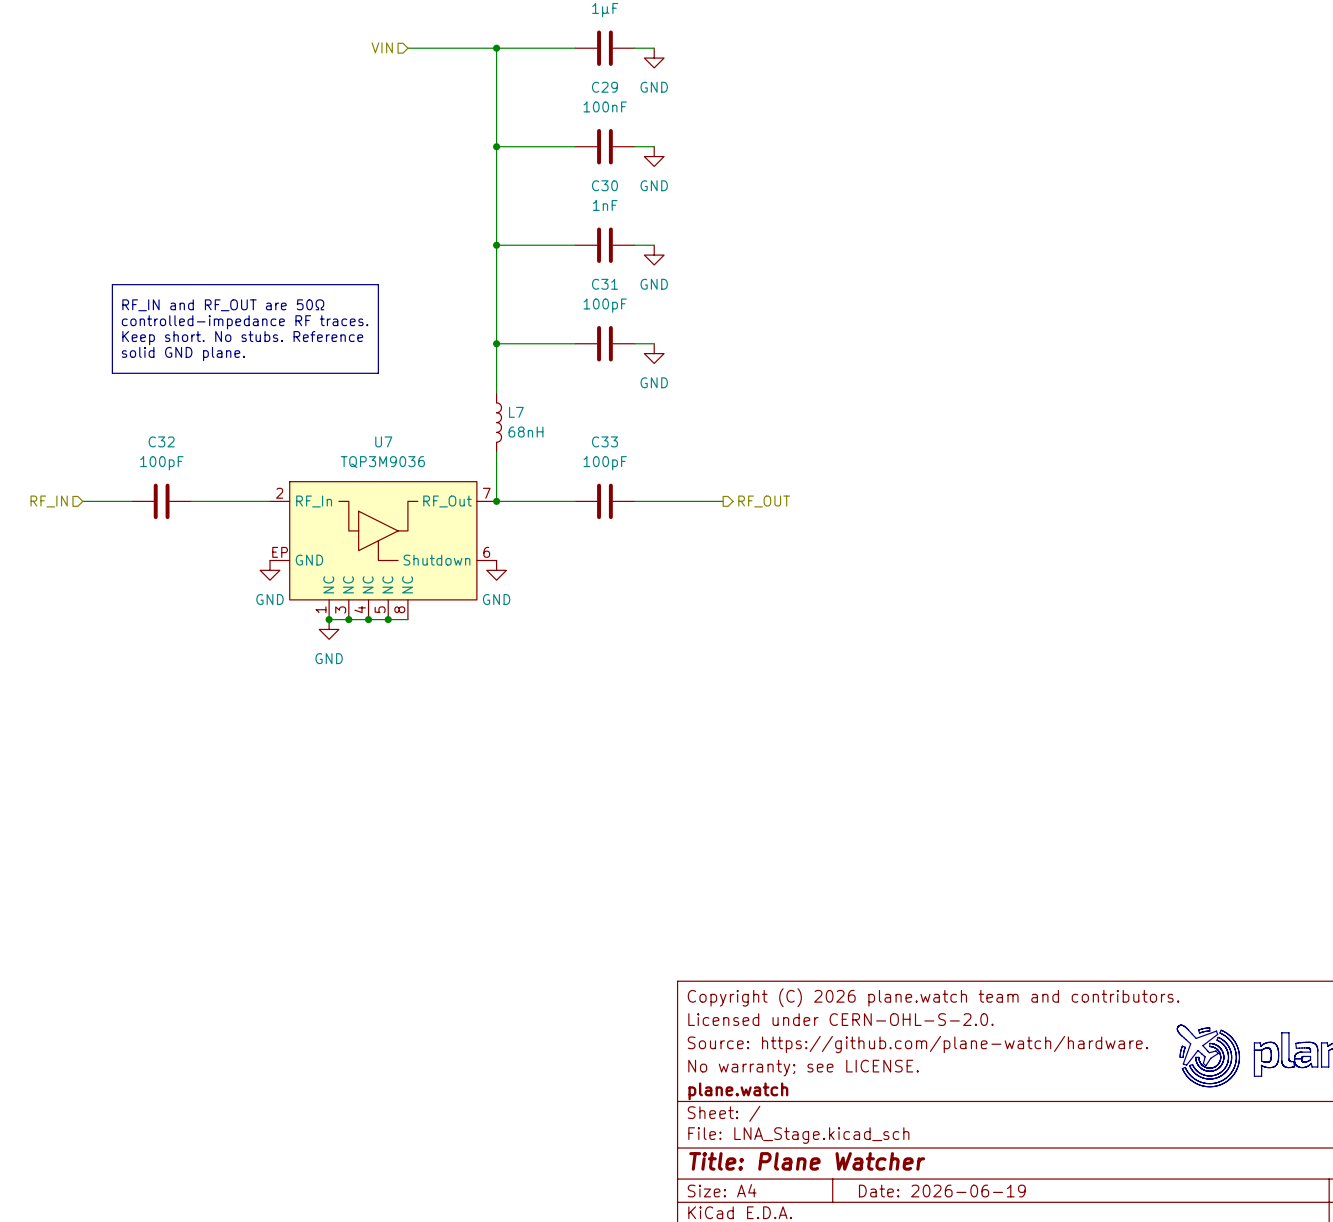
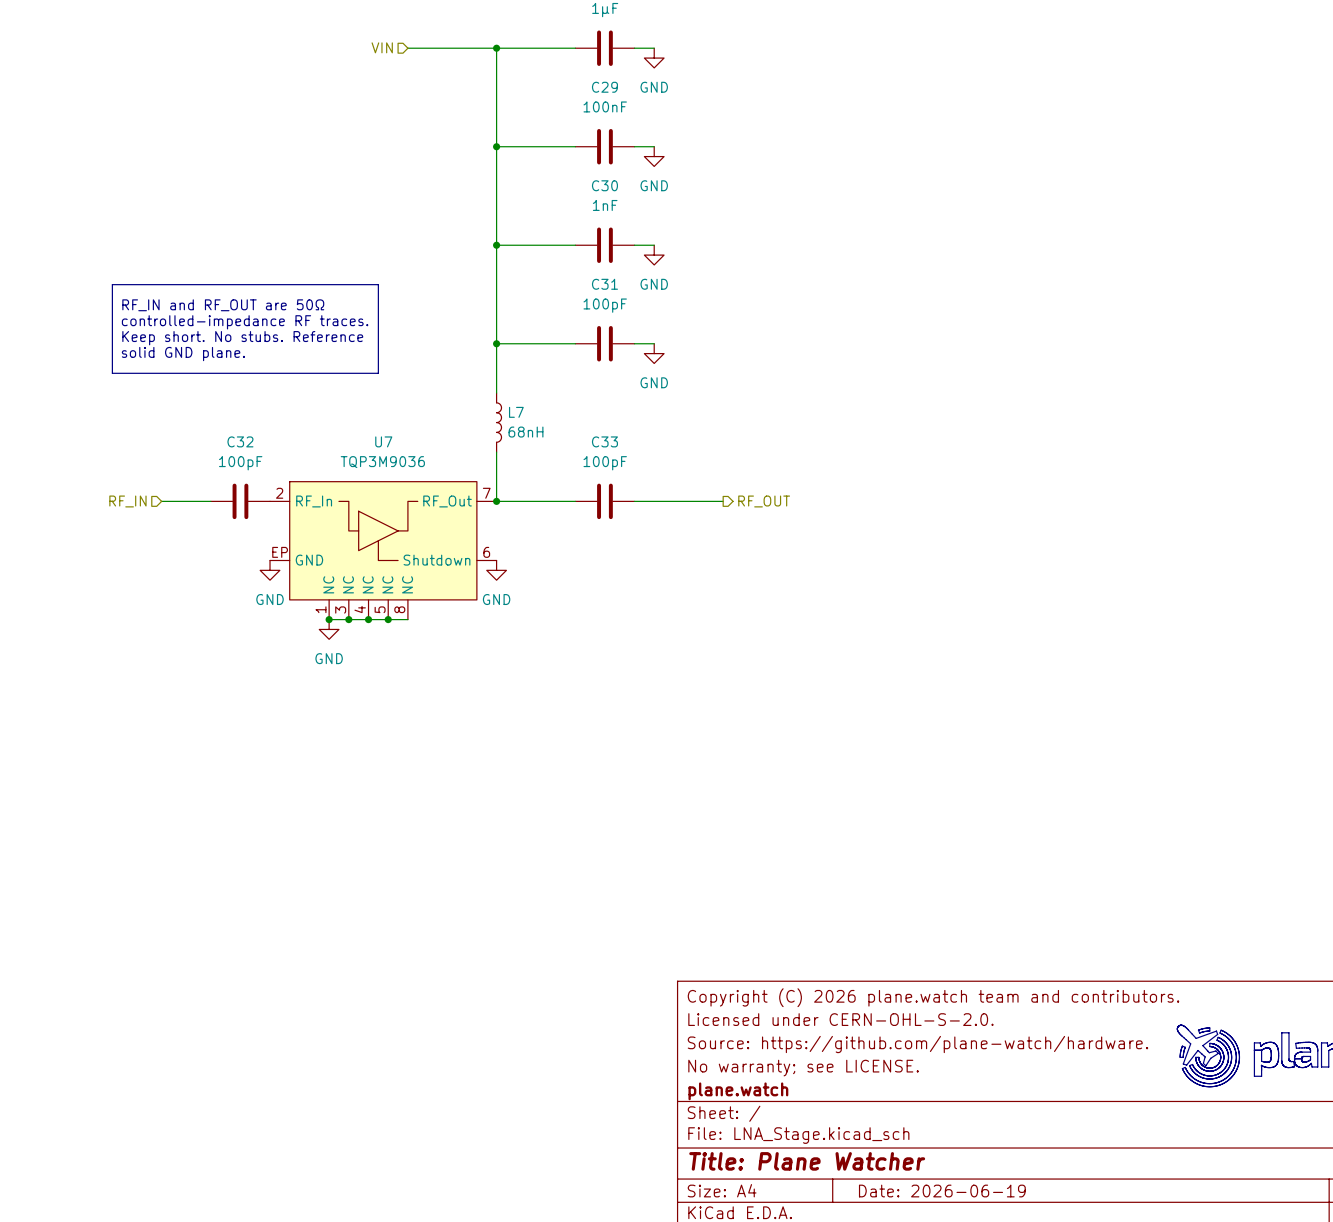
hierarchical label position: RF_IN (49, 501) -> RF_IN (127, 501)
wire: (82, 501) (132, 501) -> none
C32 position: (161, 501) -> (240, 501)

